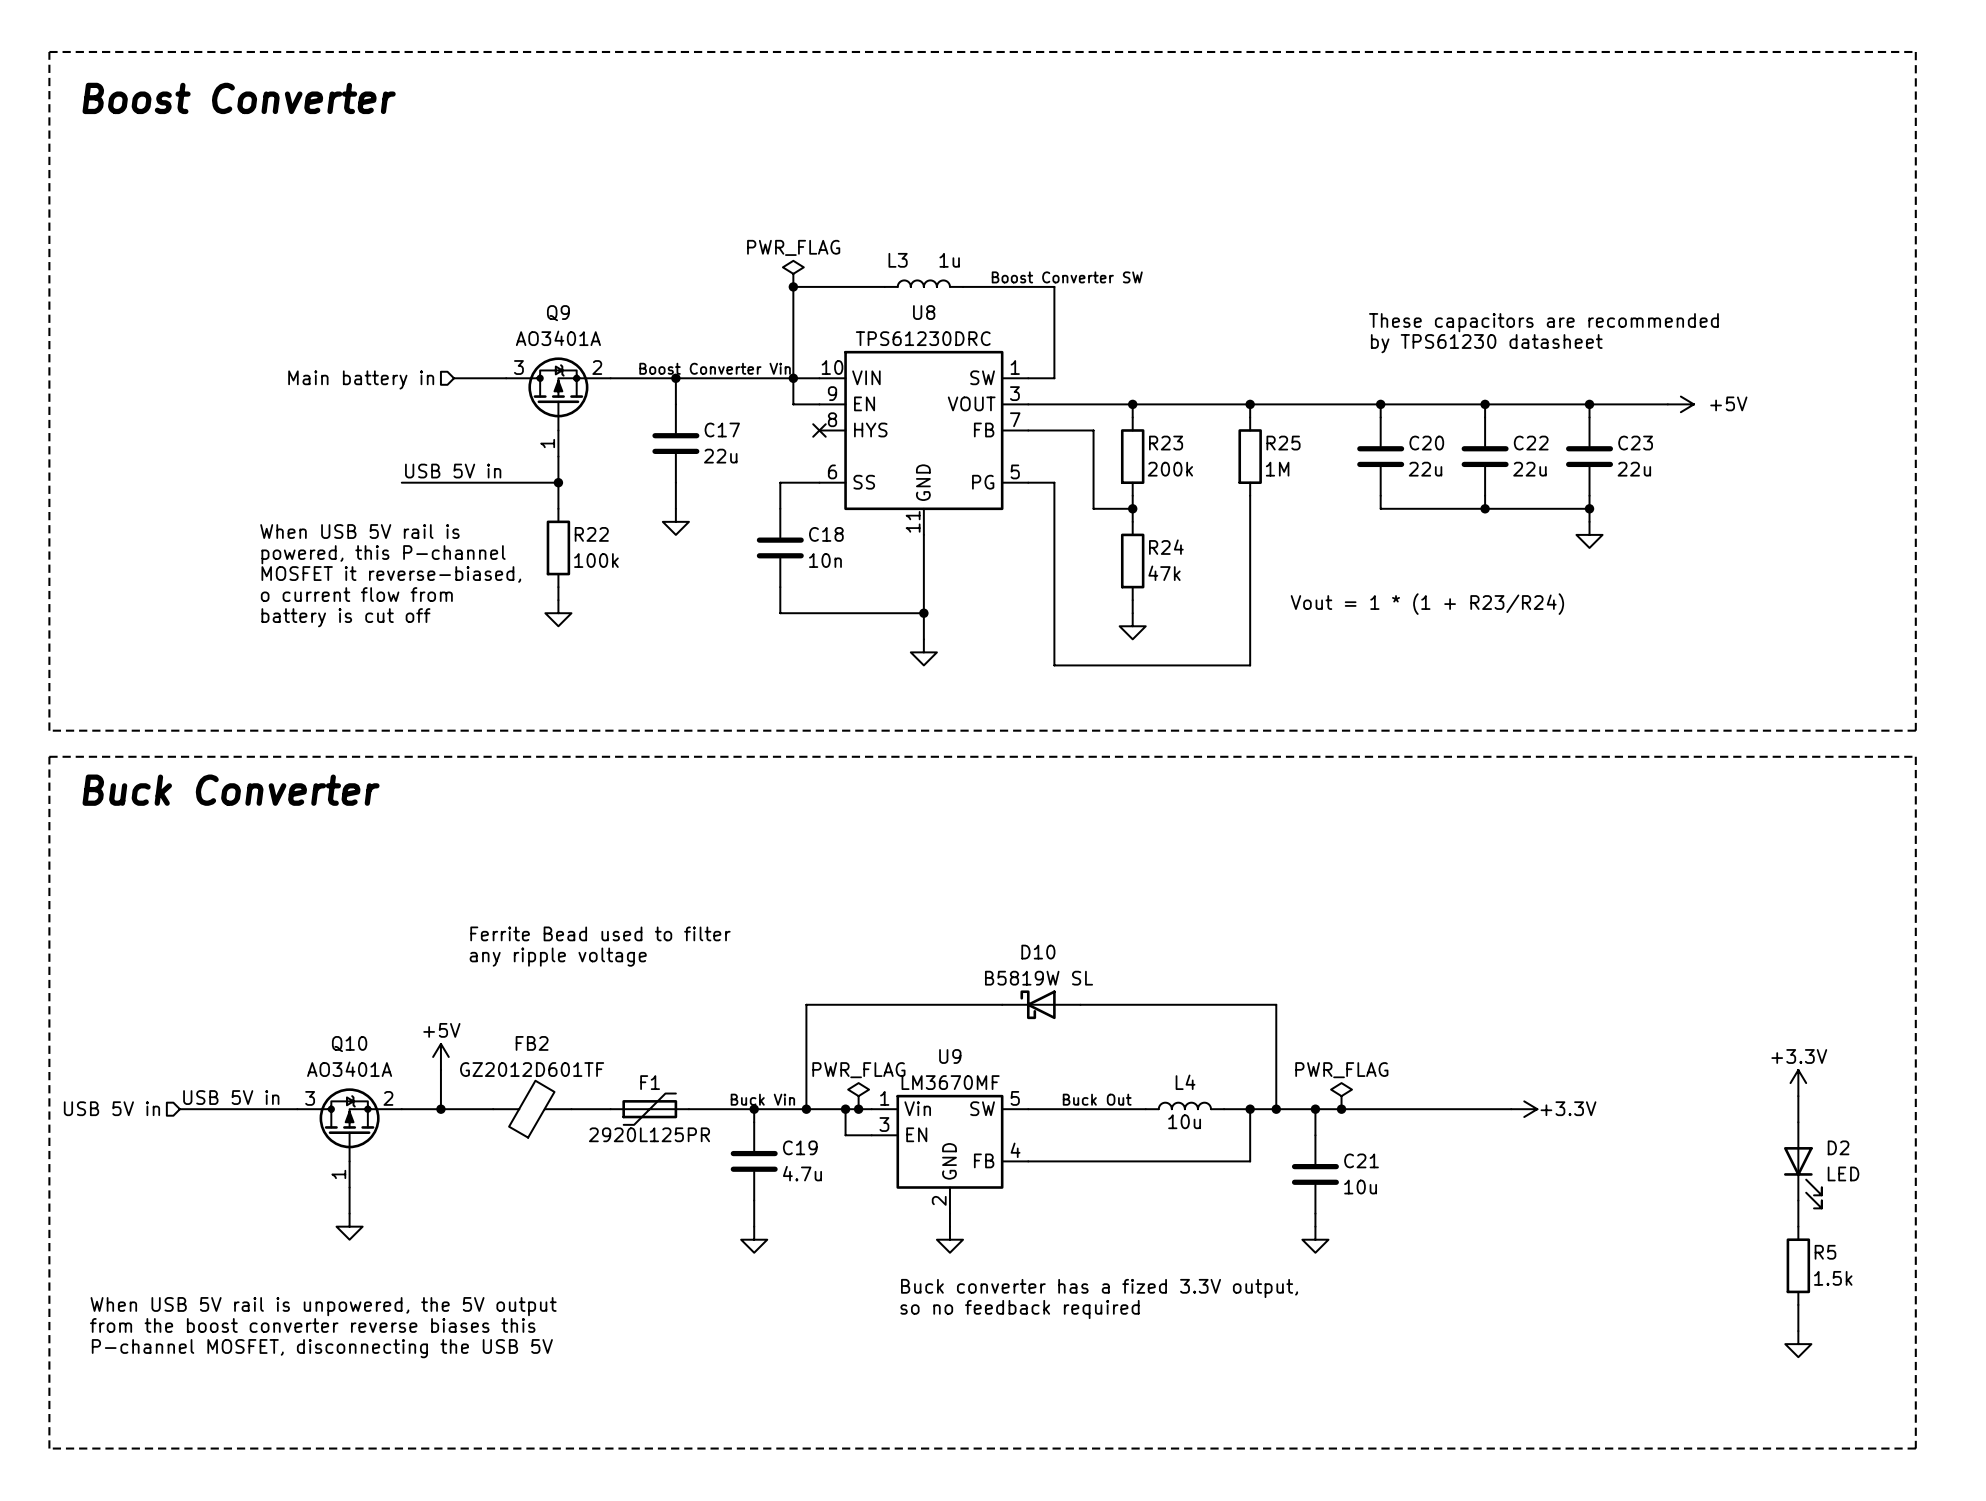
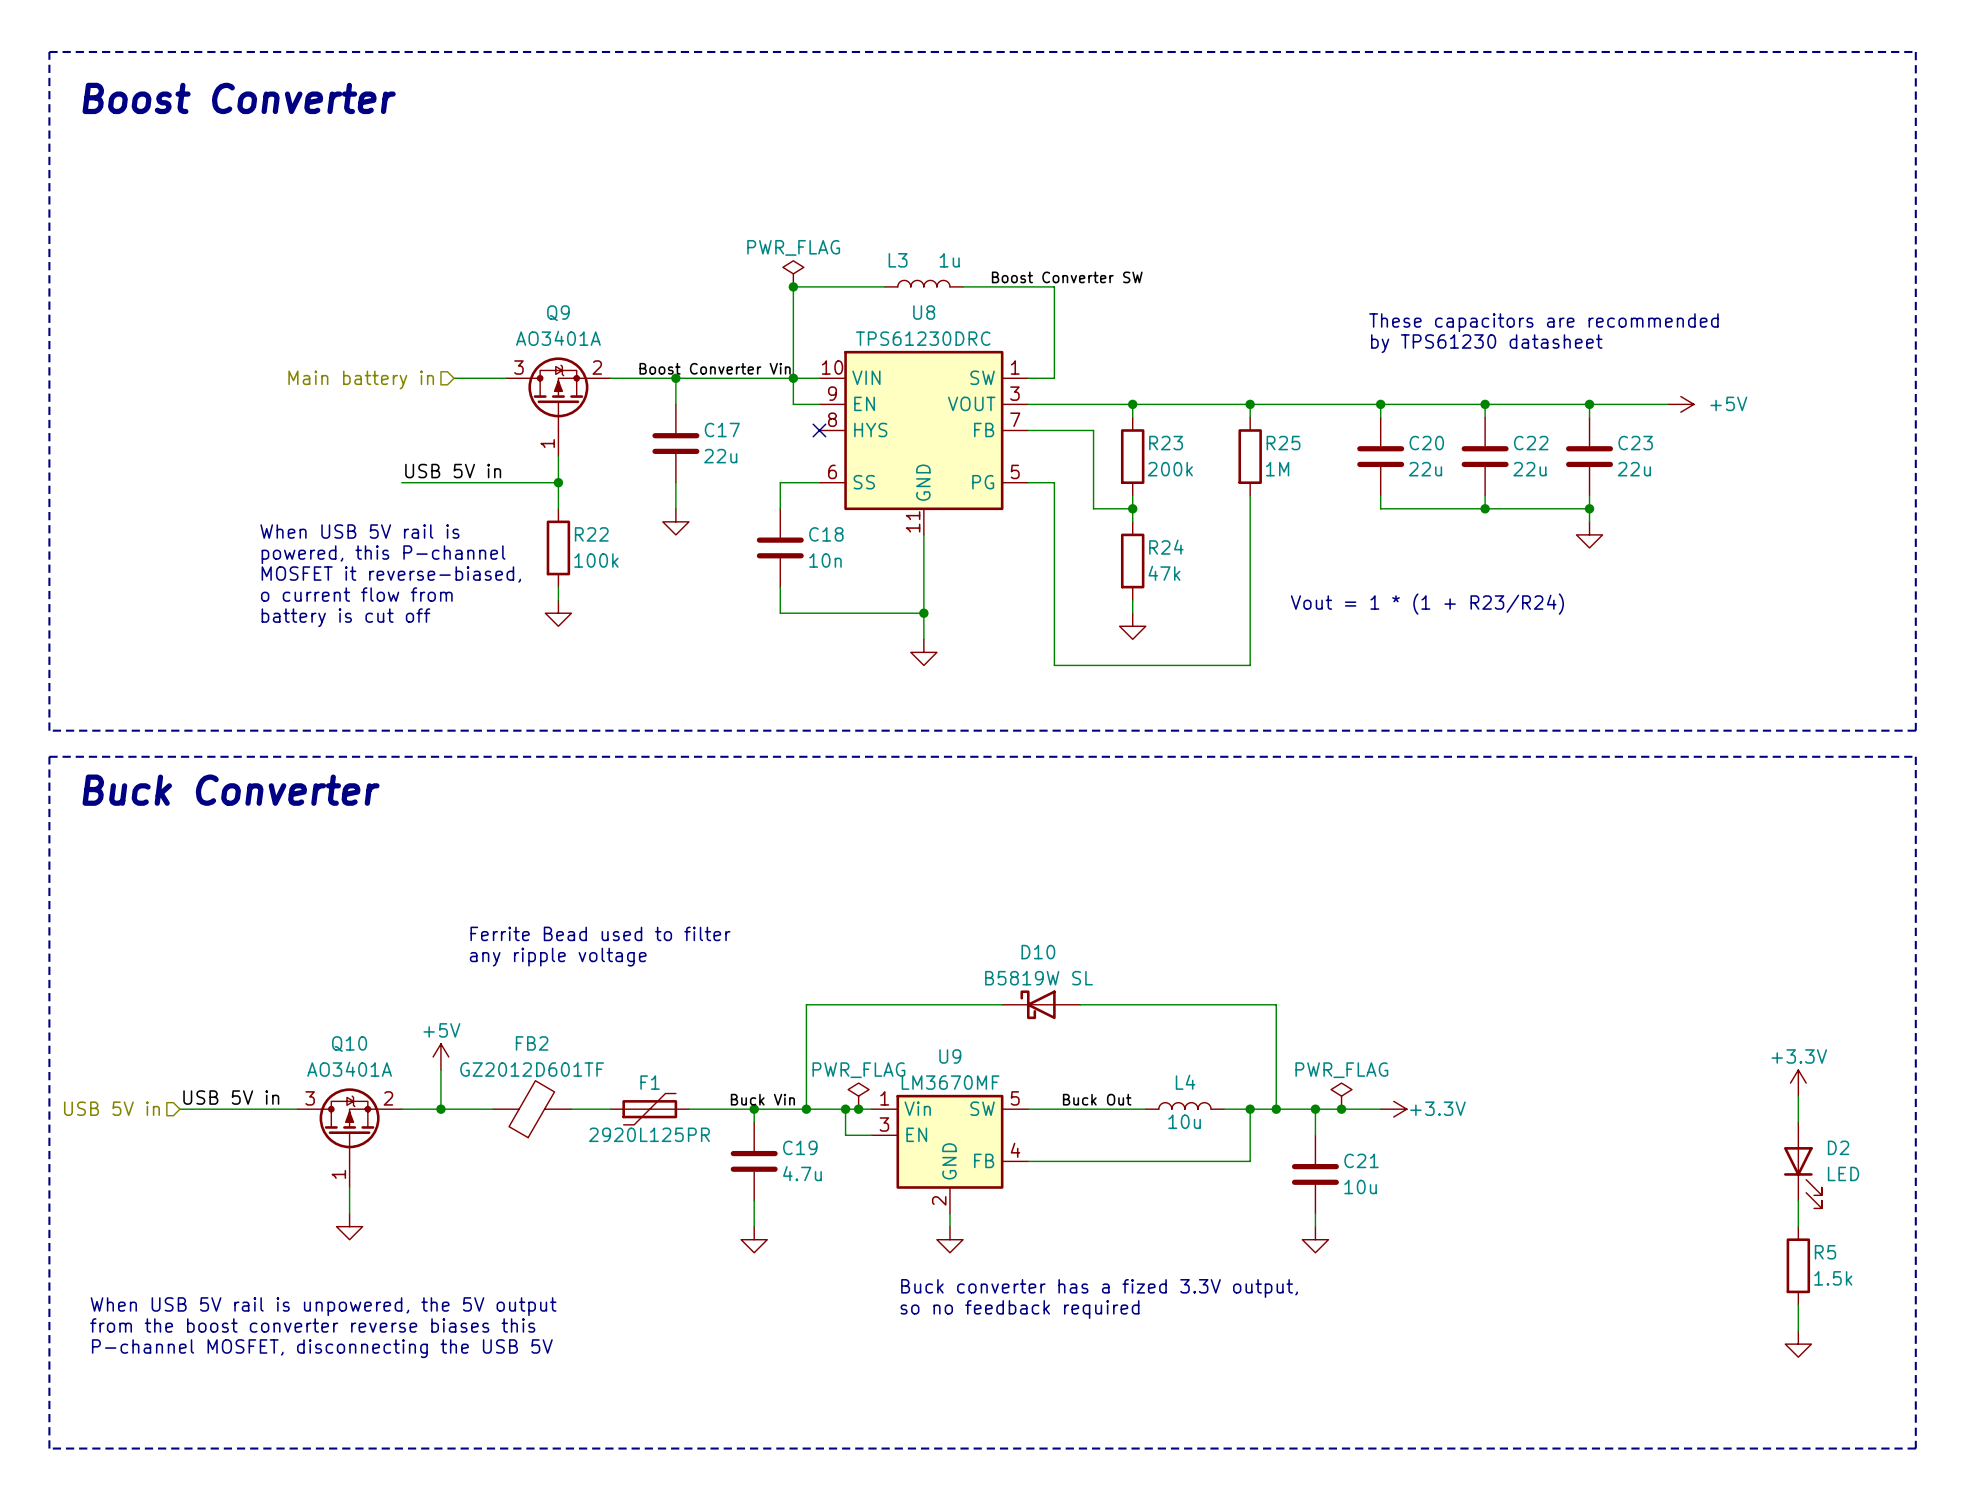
wire: (1380, 1109) (1511, 1109) -> none
power symbol position: +3.3V (1524, 1109) -> +3.3V (1393, 1109)

